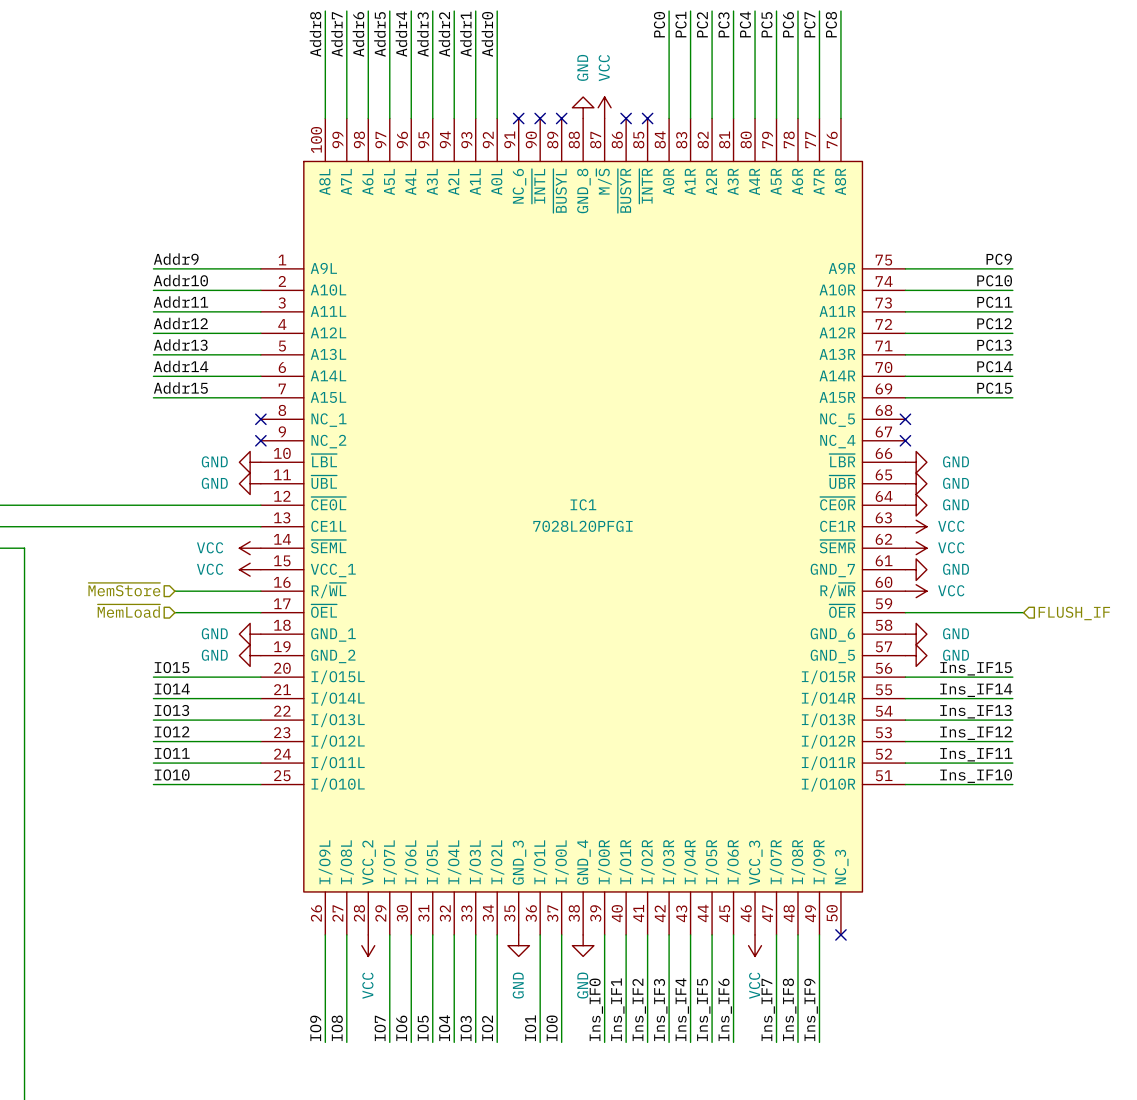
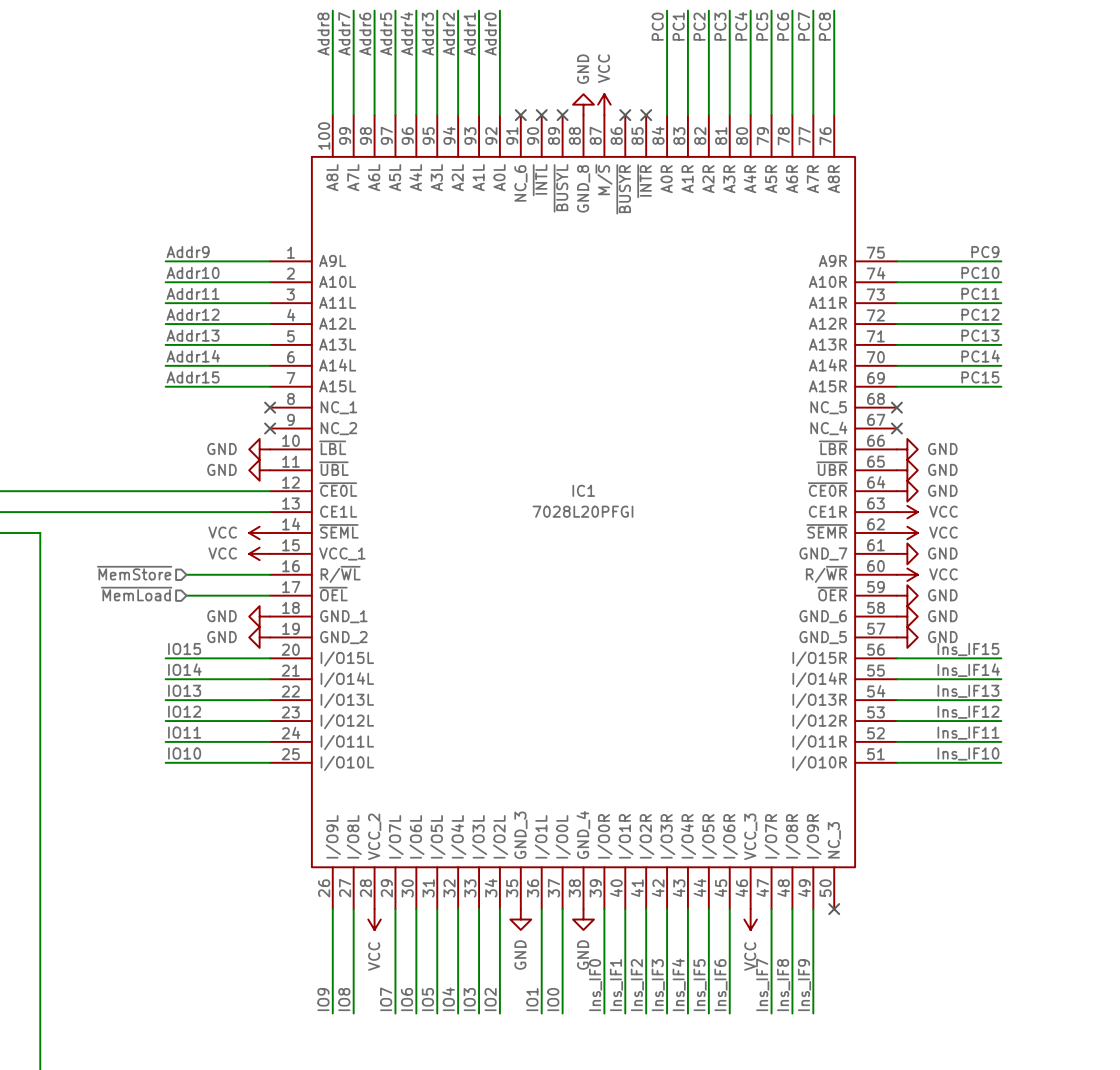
wire: (905, 612) (1023, 612) -> none
power symbol: none -> GND (907, 595)
hierarchical label: FLUSH_IF (1074, 613) -> none

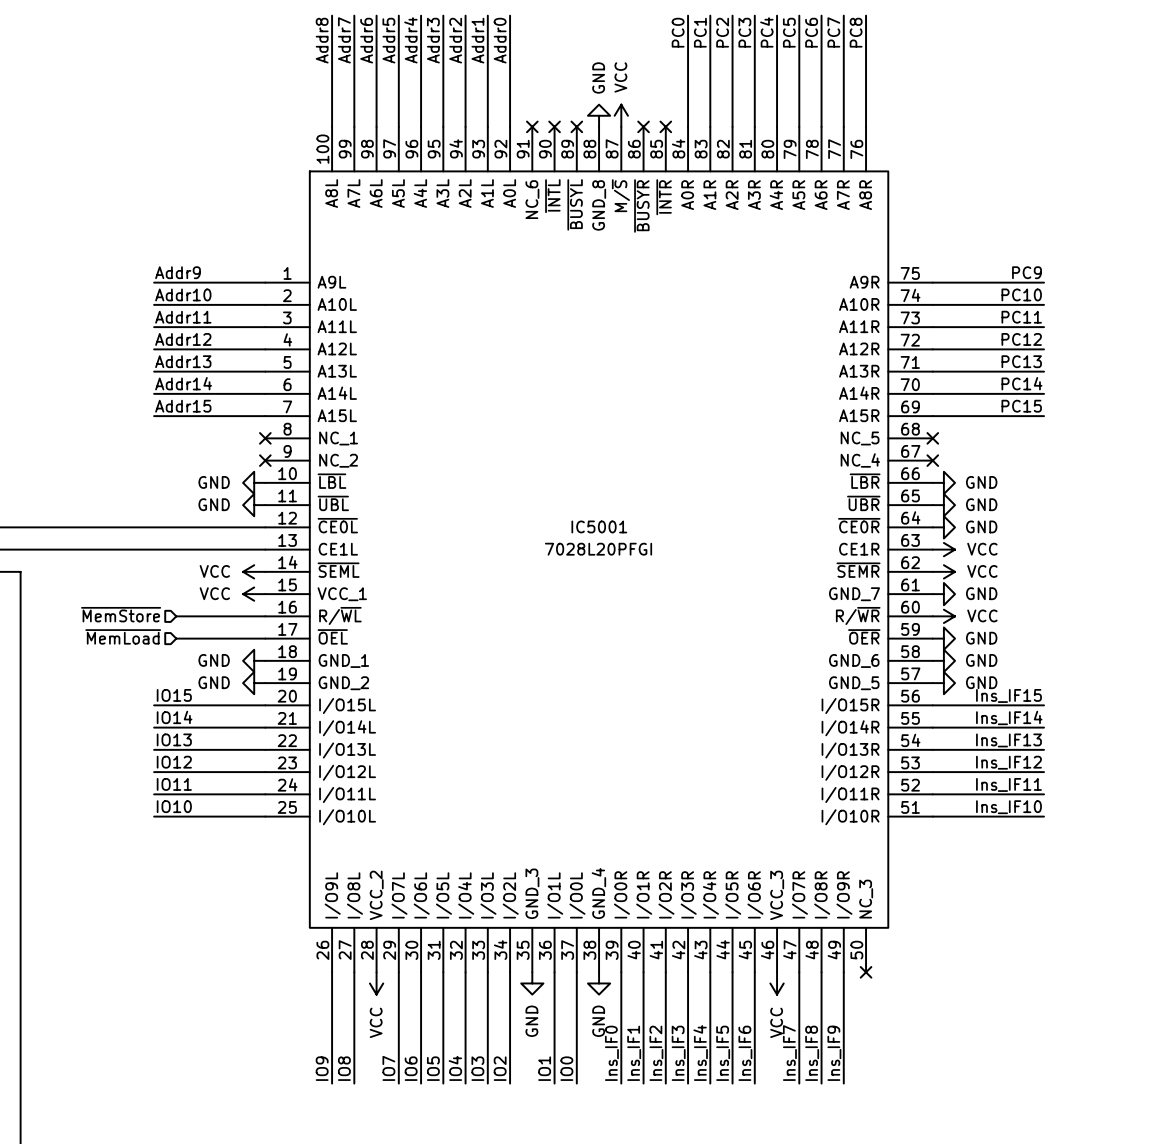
IC1 name: IC1 (583, 490) -> IC5001 (599, 526)

